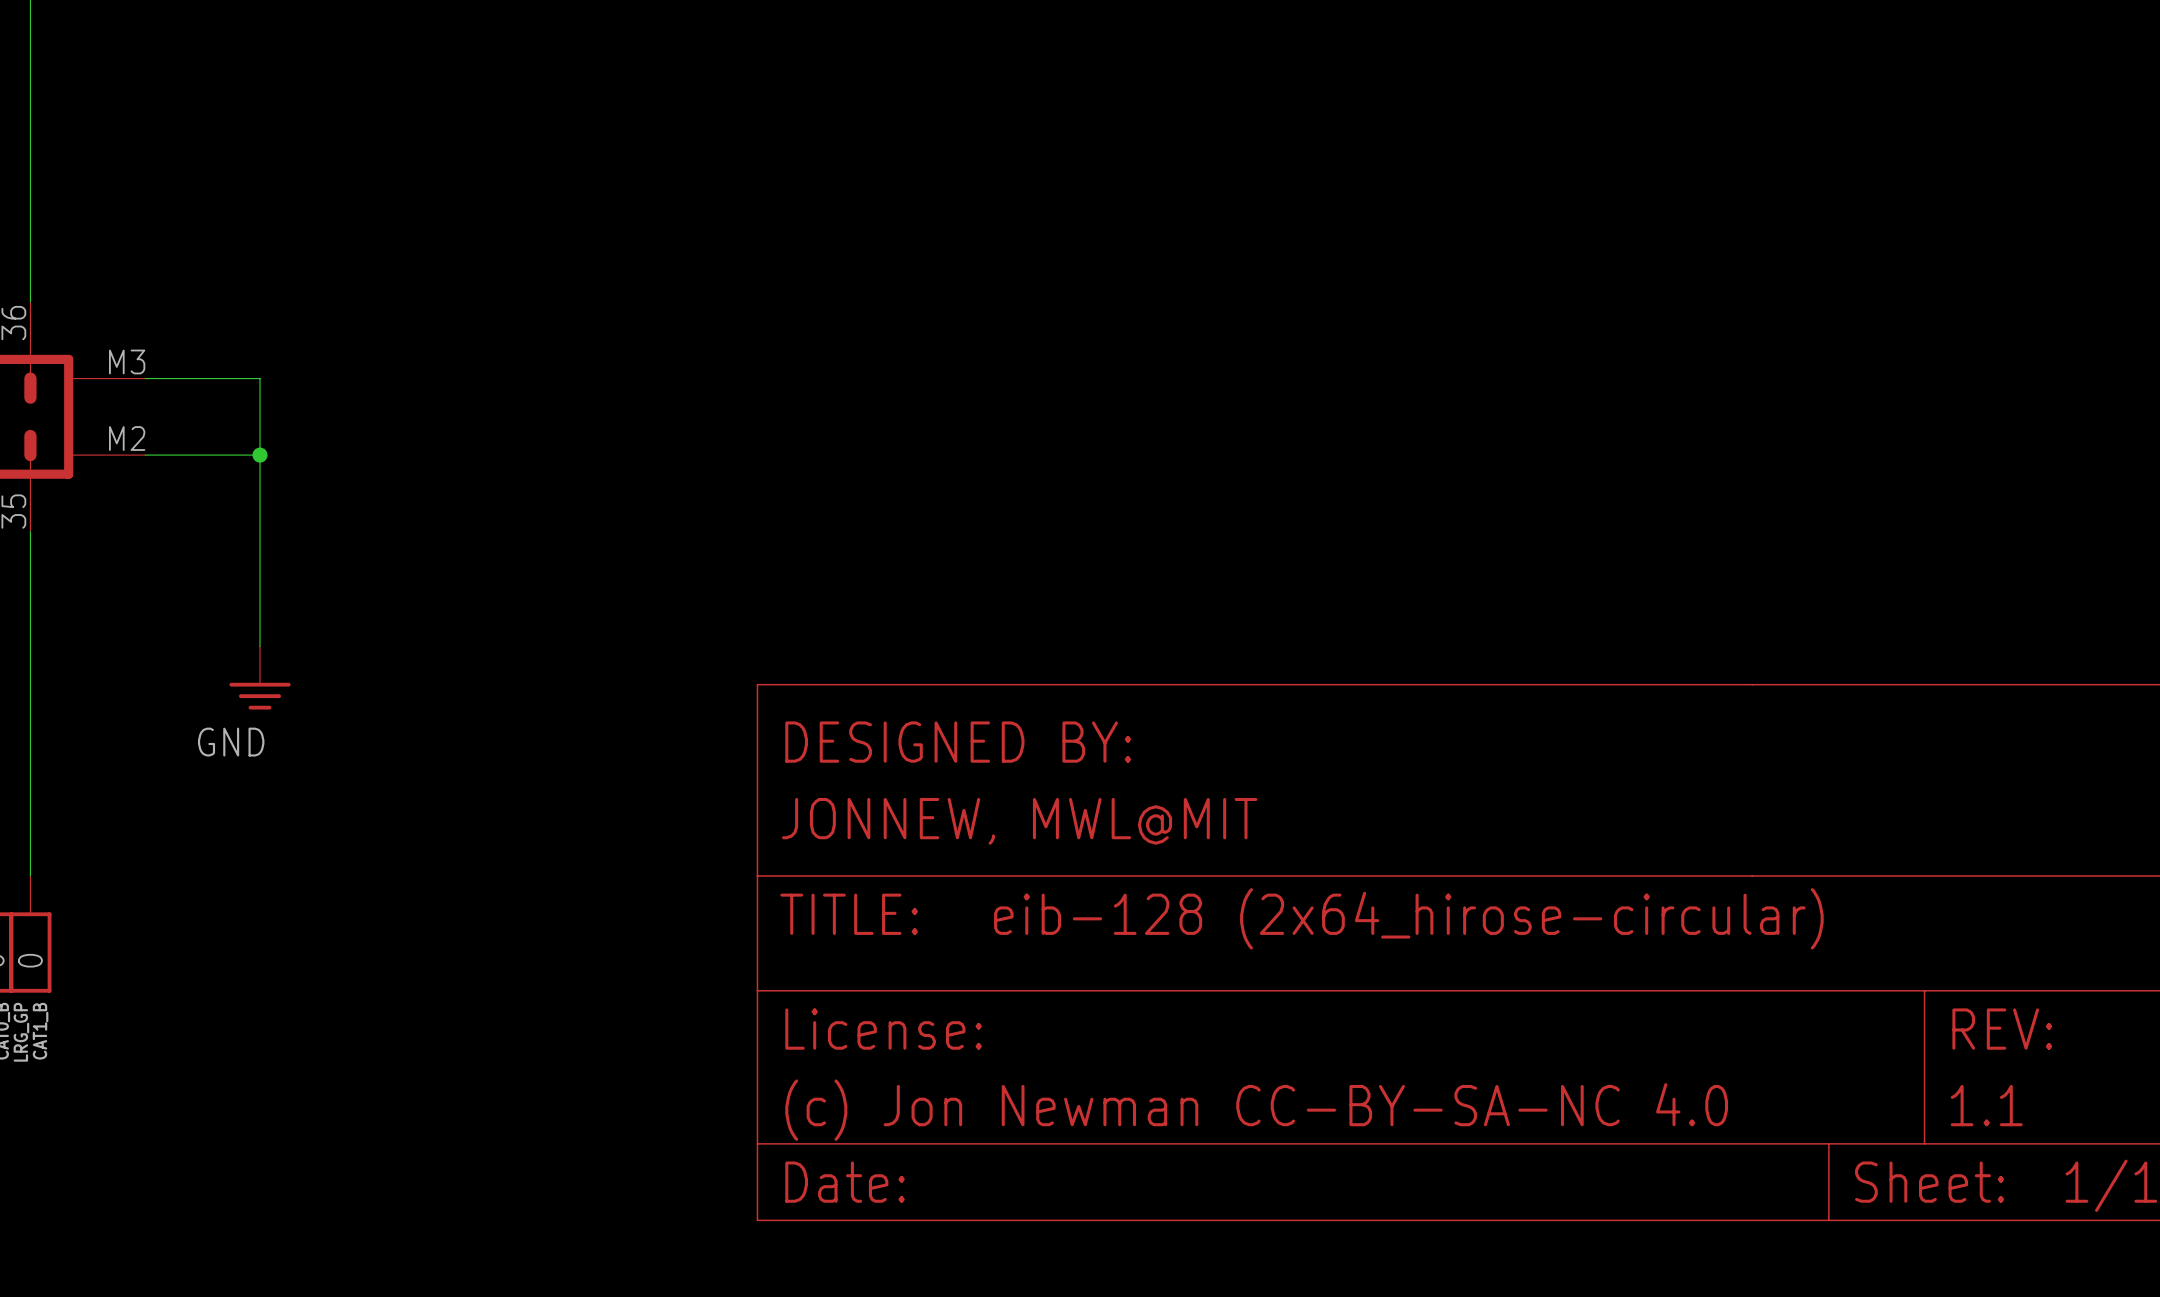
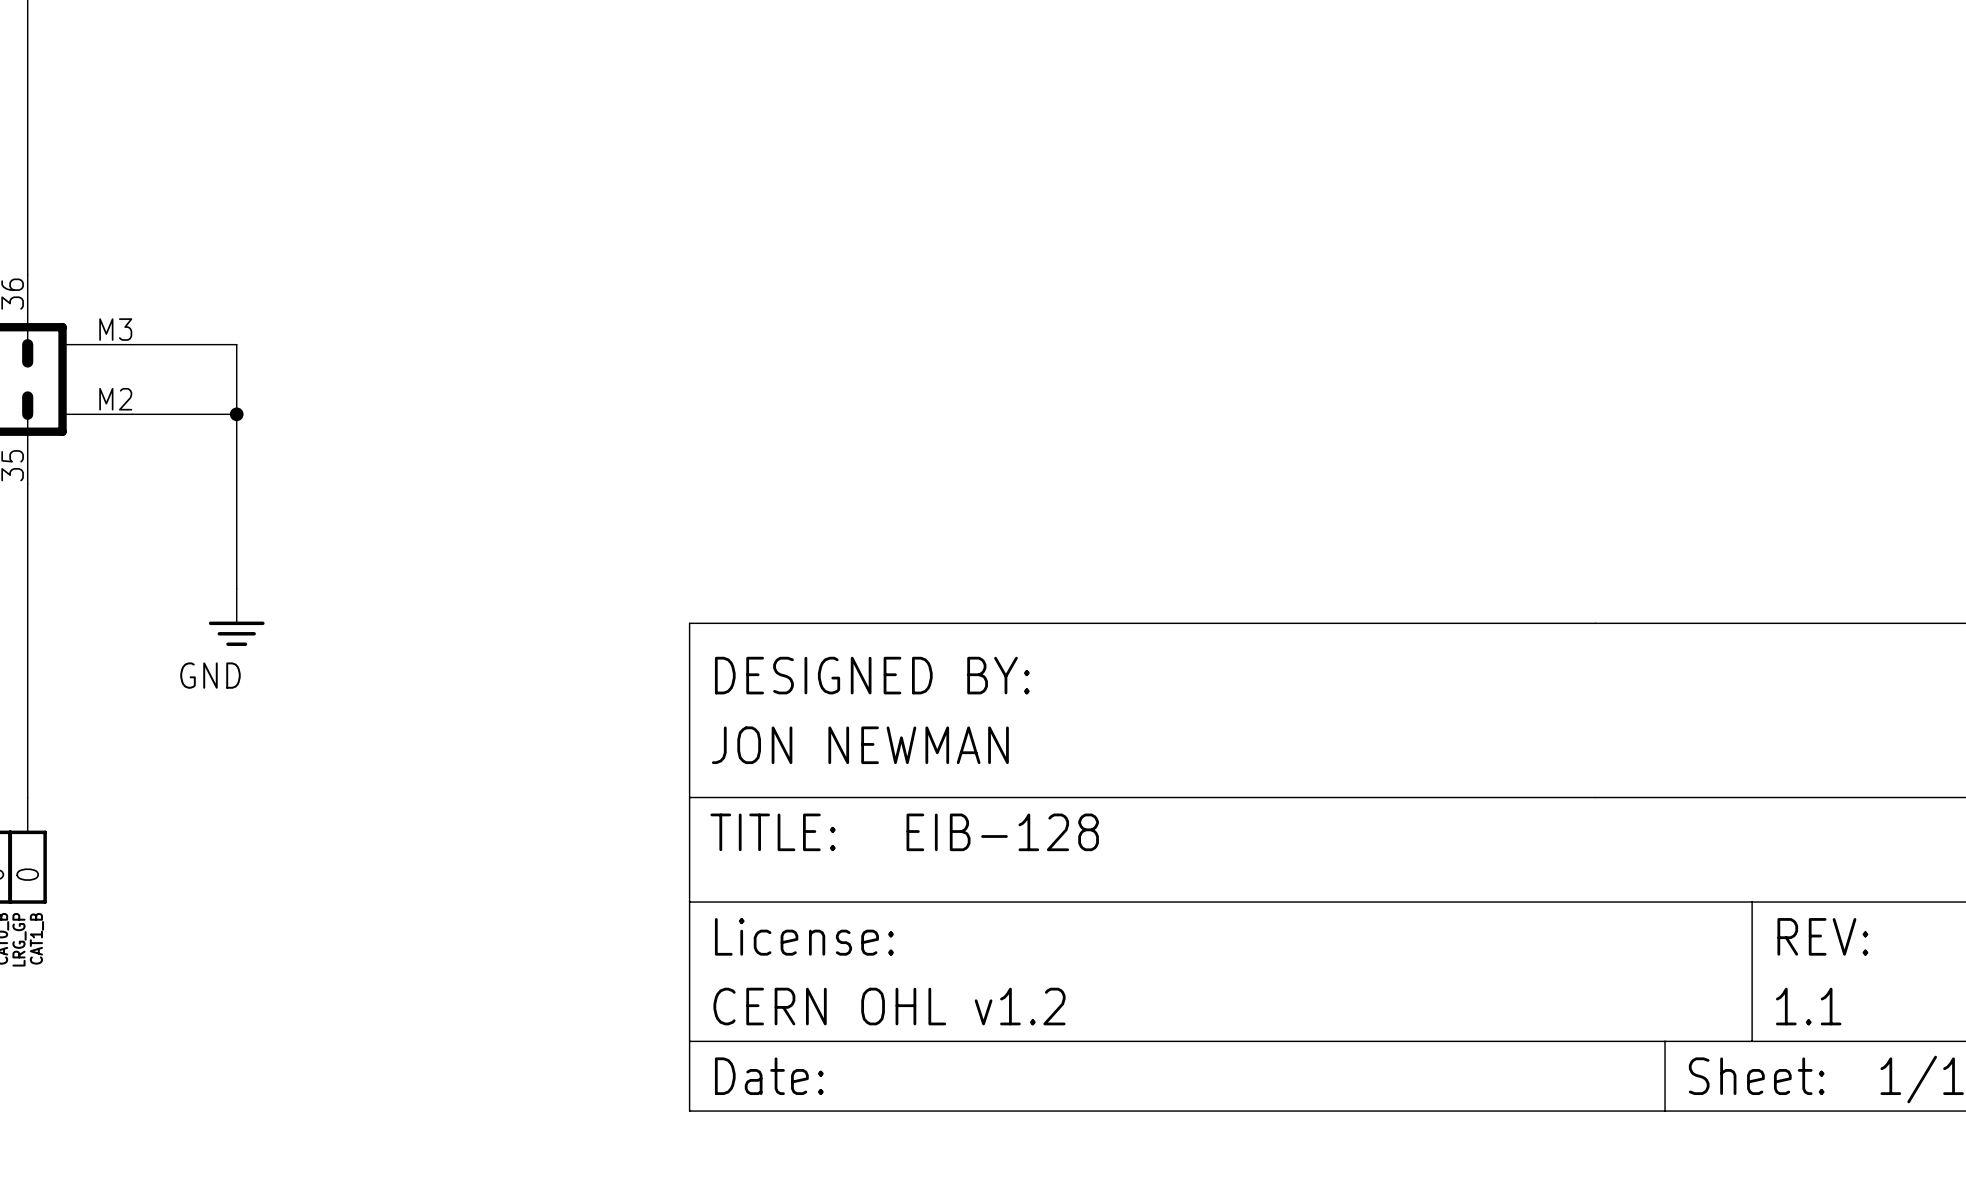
part text: JONNEW, MWL@MIT (1019, 821) -> JON NEWMAN (860, 745)
part text: eib-128 (2x64_hirose-circular) (1408, 918) -> EIB-128 (1002, 832)
part text: (c) Jon Newman CC-BY-SA-NC 4.0 (1256, 1110) -> CERN OHL v1.2 (889, 1006)

